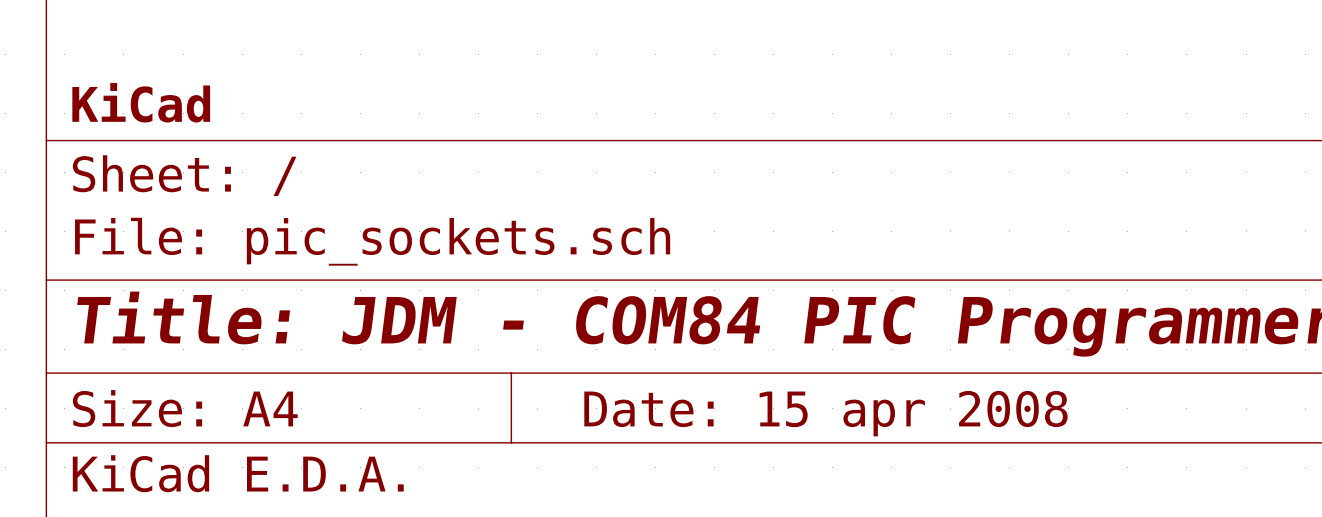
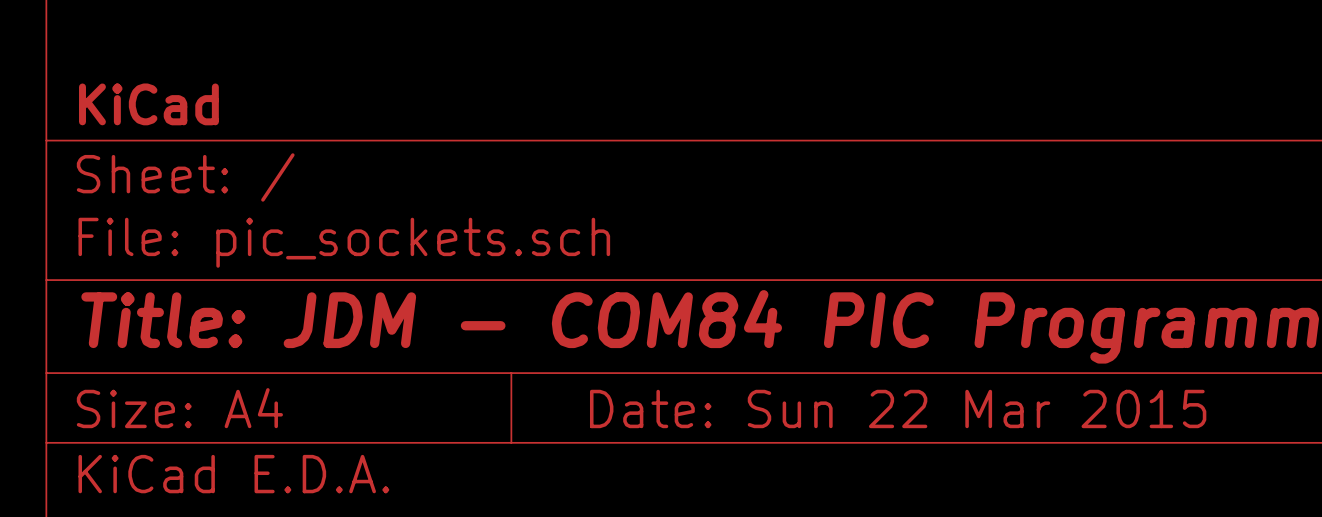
title block: Date: 15 apr 2008 (825, 413) -> Date: Sun 22 Mar 2015 (898, 408)

